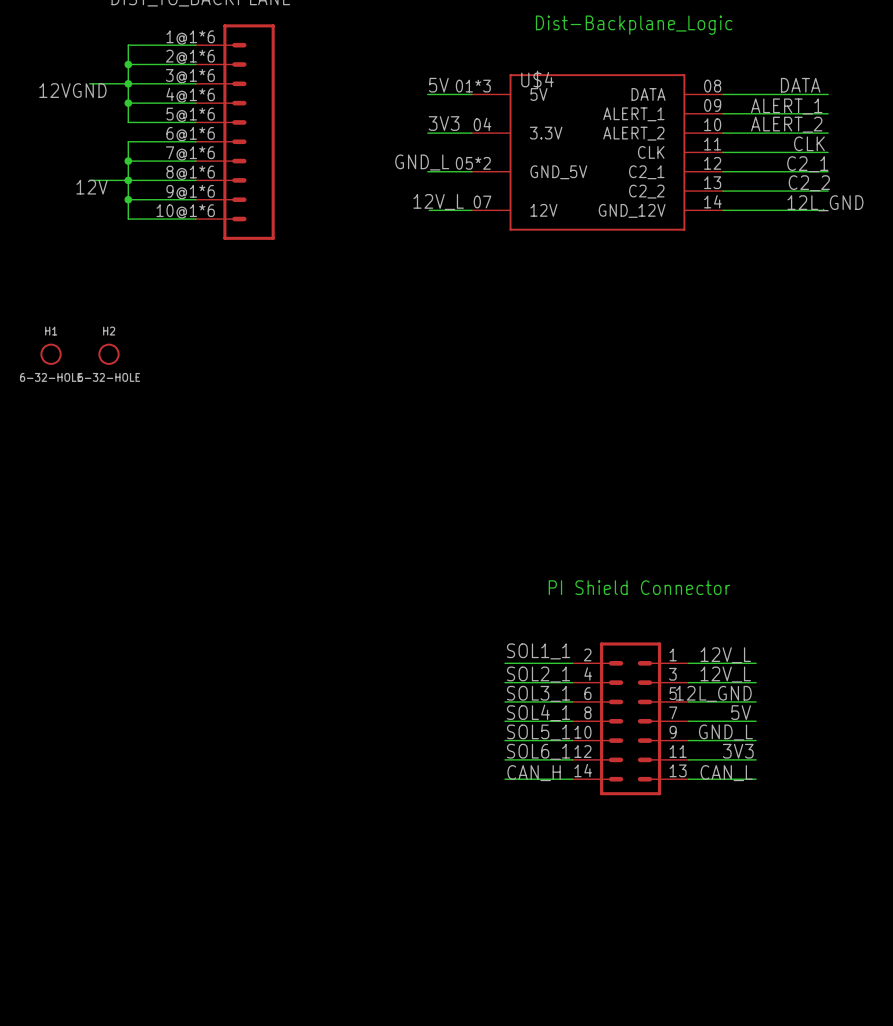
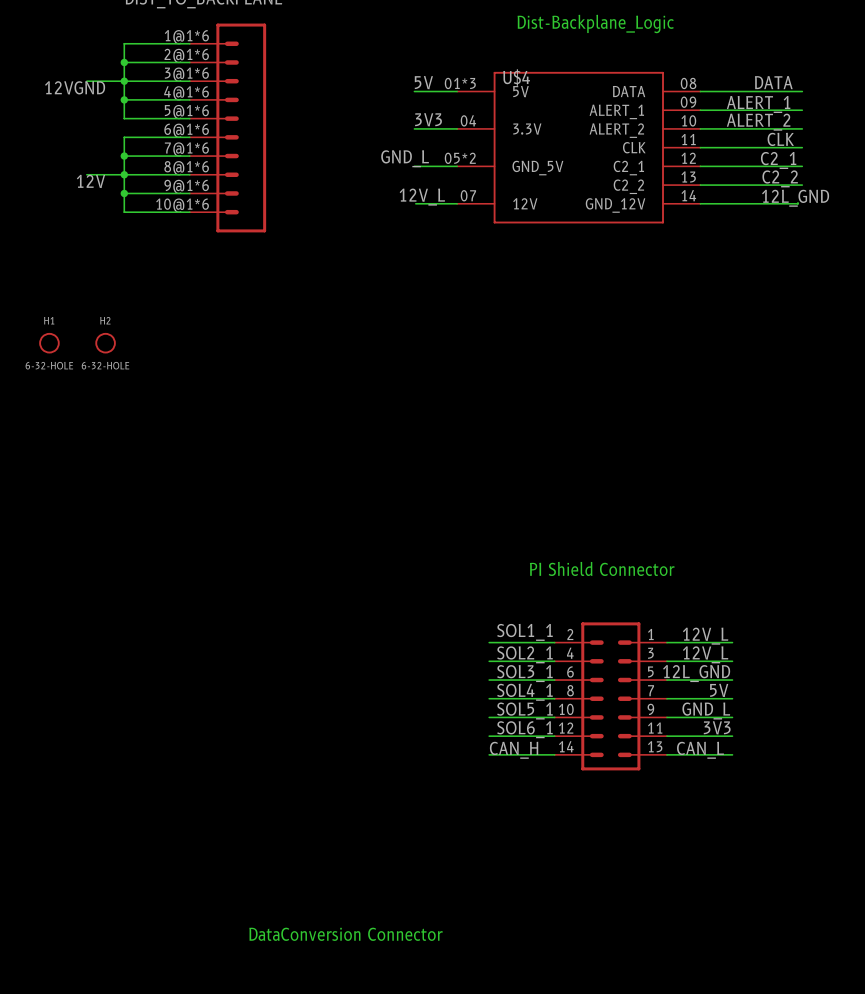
text: none -> DataConversion Connector (345, 934)

